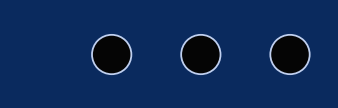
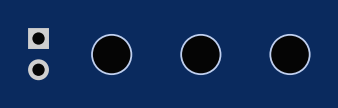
part: none -> (38, 54)

